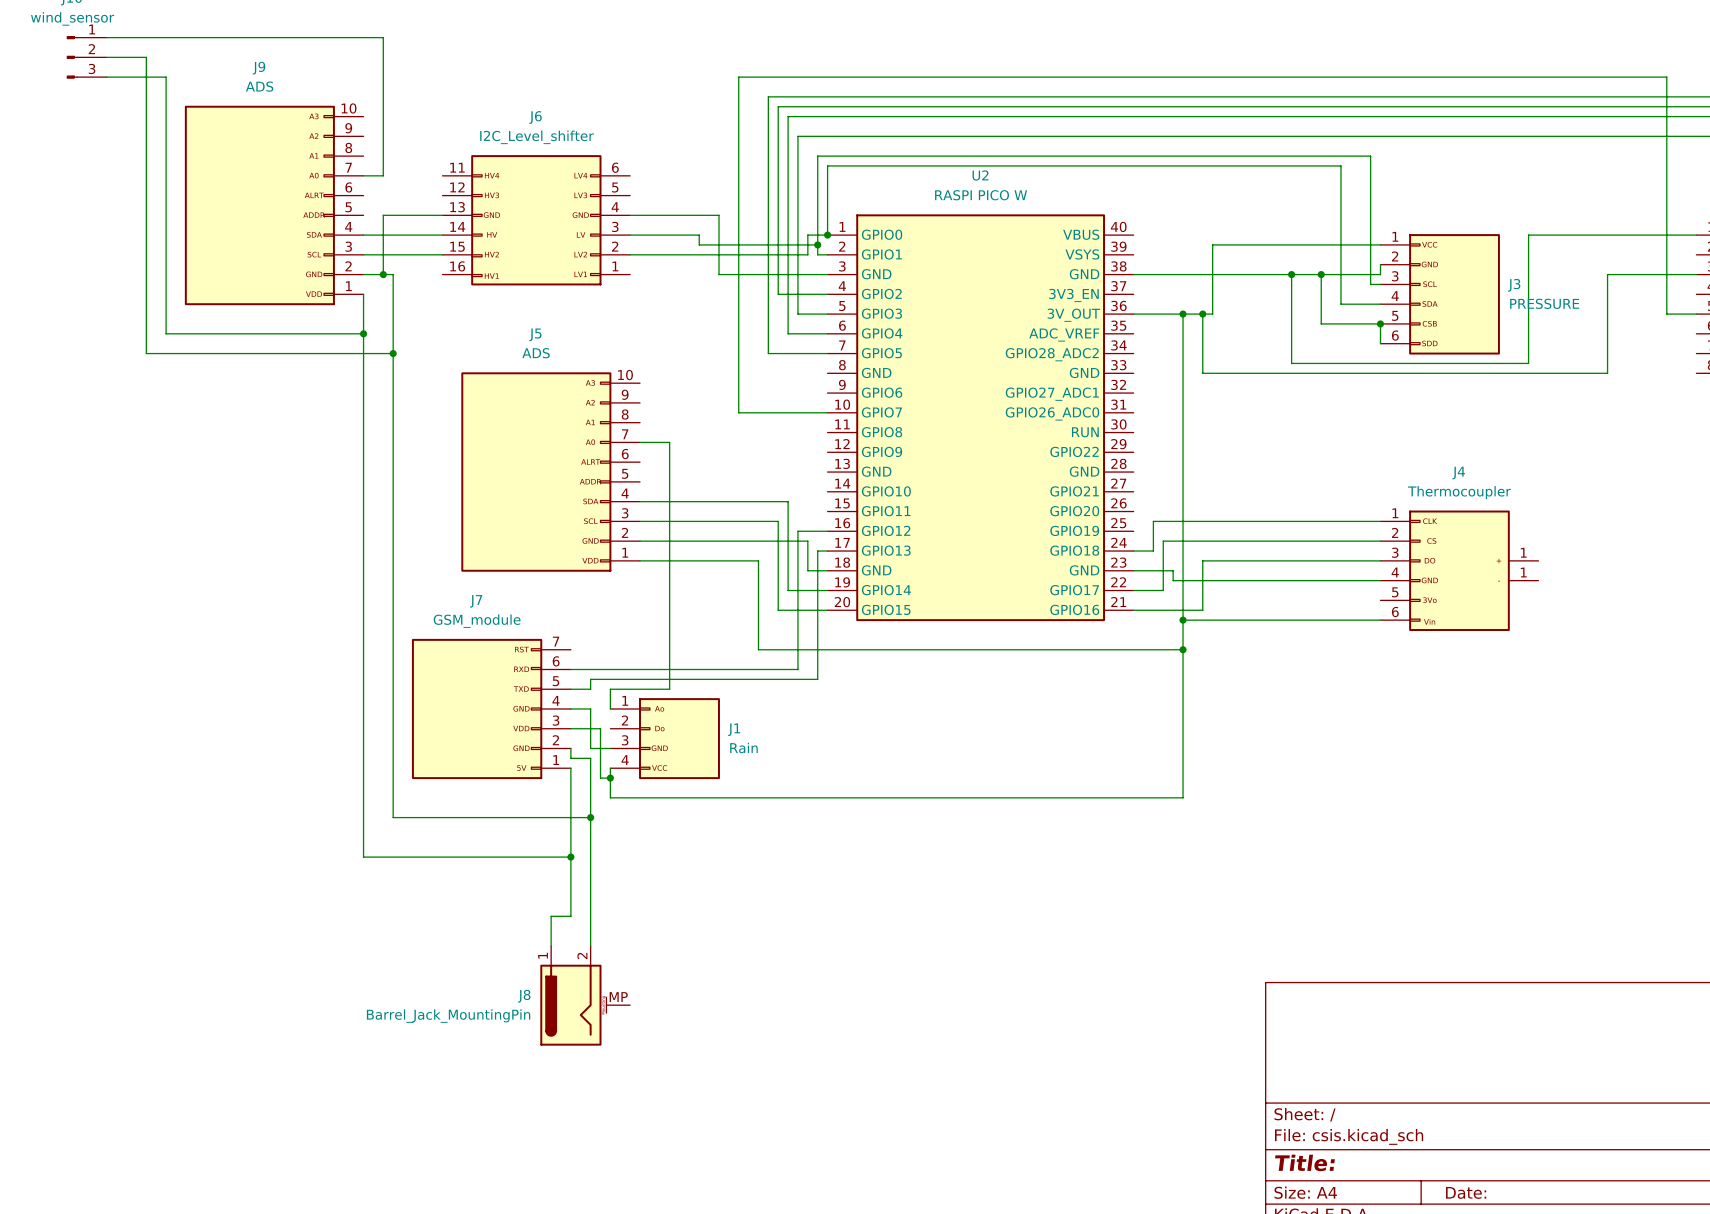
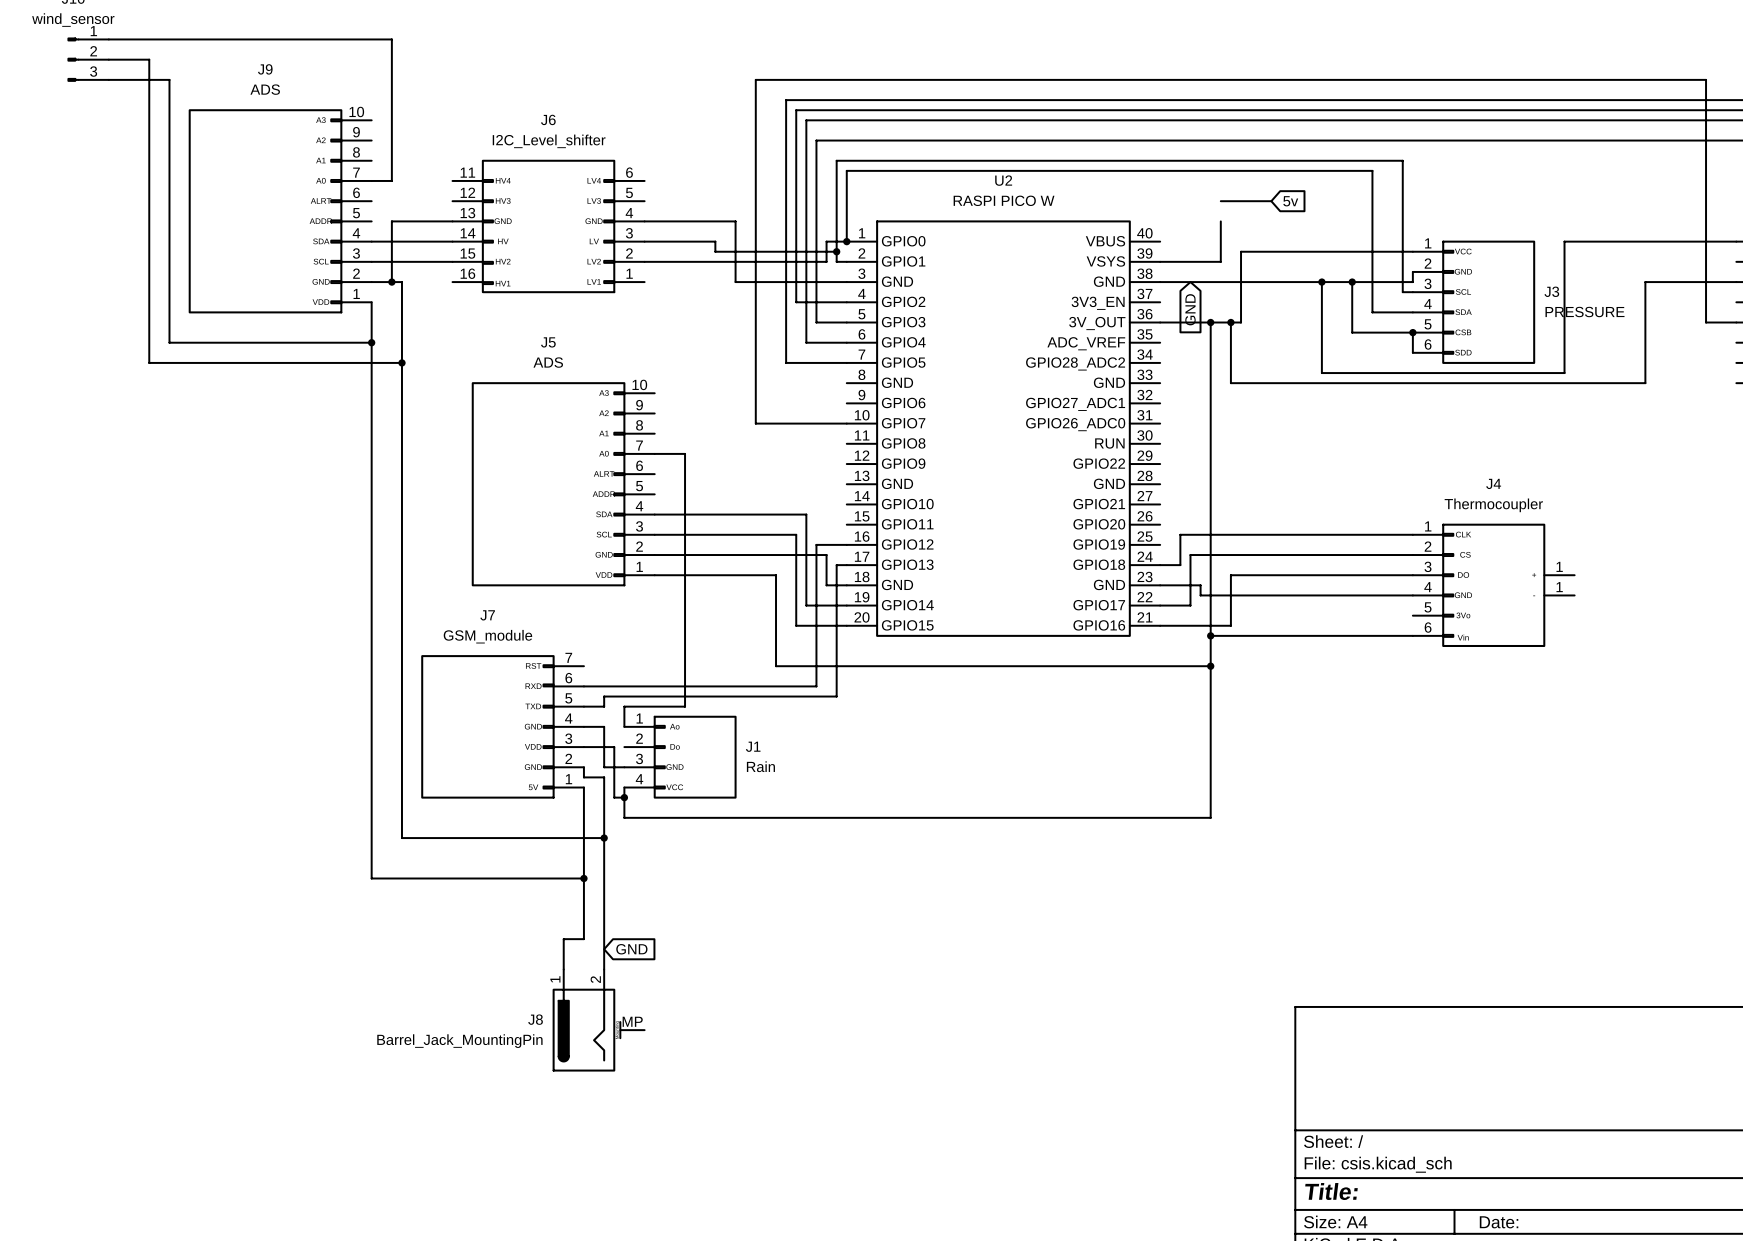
wire: none -> (1220, 201) (1271, 201)
global label: none -> 5v (1290, 201)
wire: none -> (1220, 221) (1220, 261) (1160, 261)
global label: none -> GND (1190, 309)
global label: none -> GND (631, 949)

